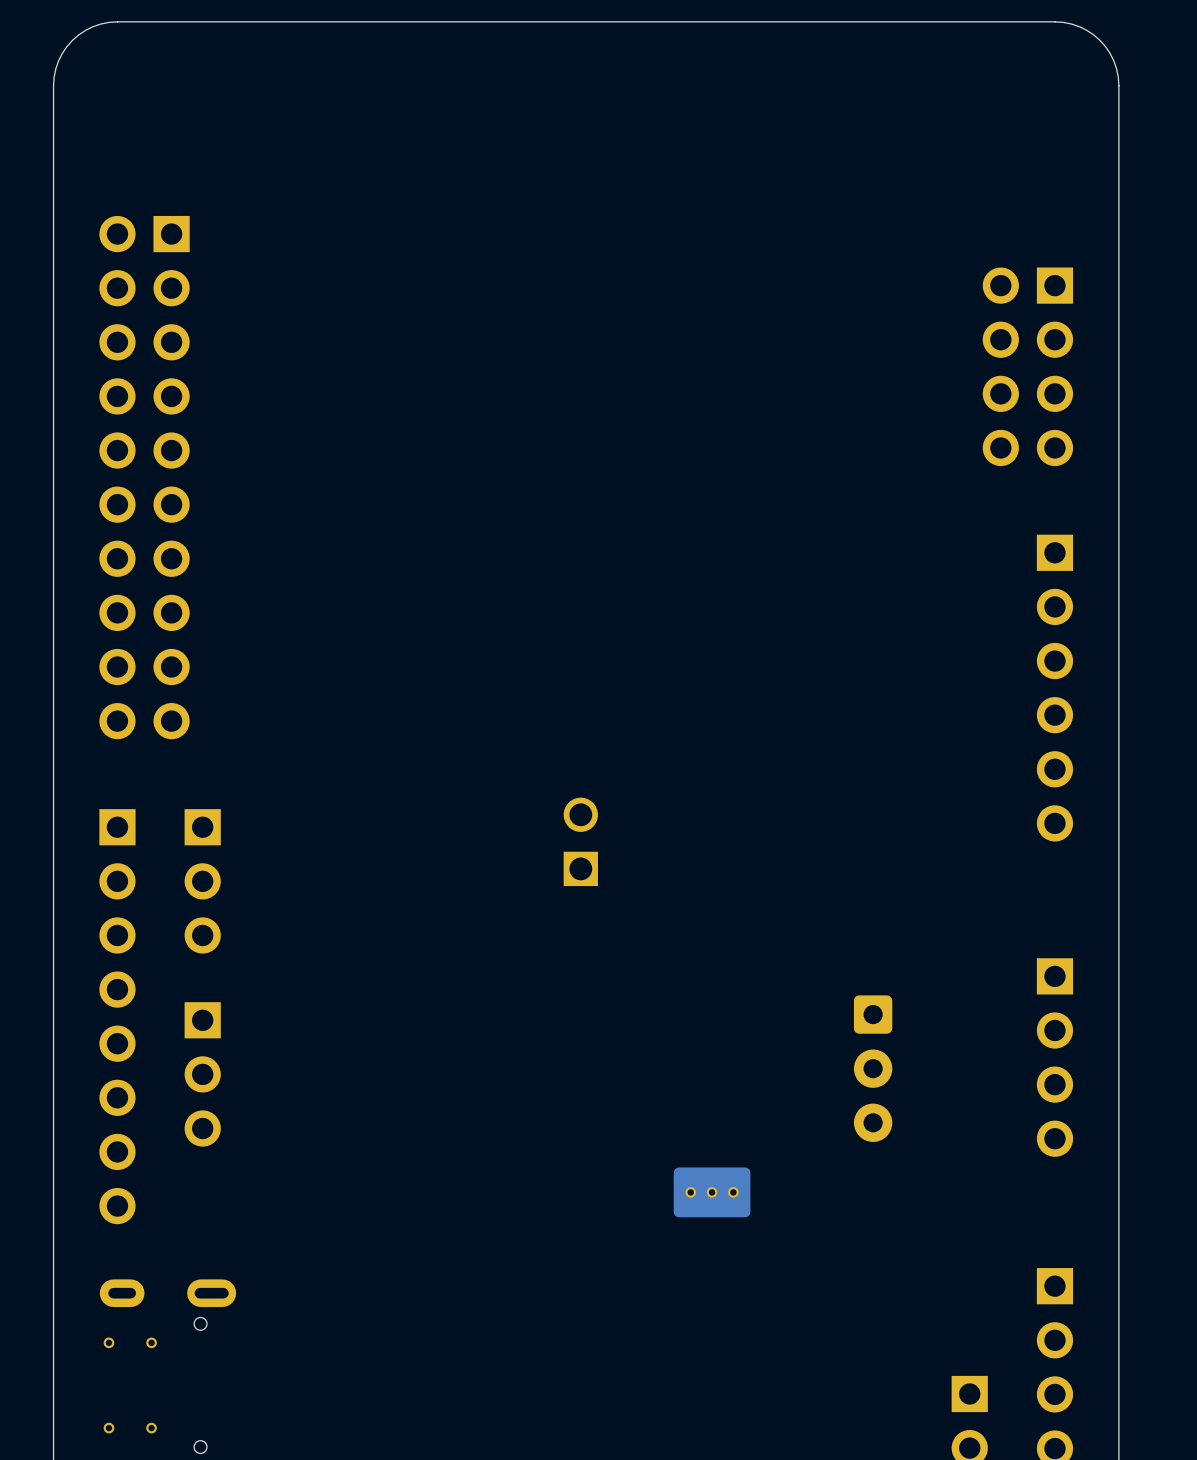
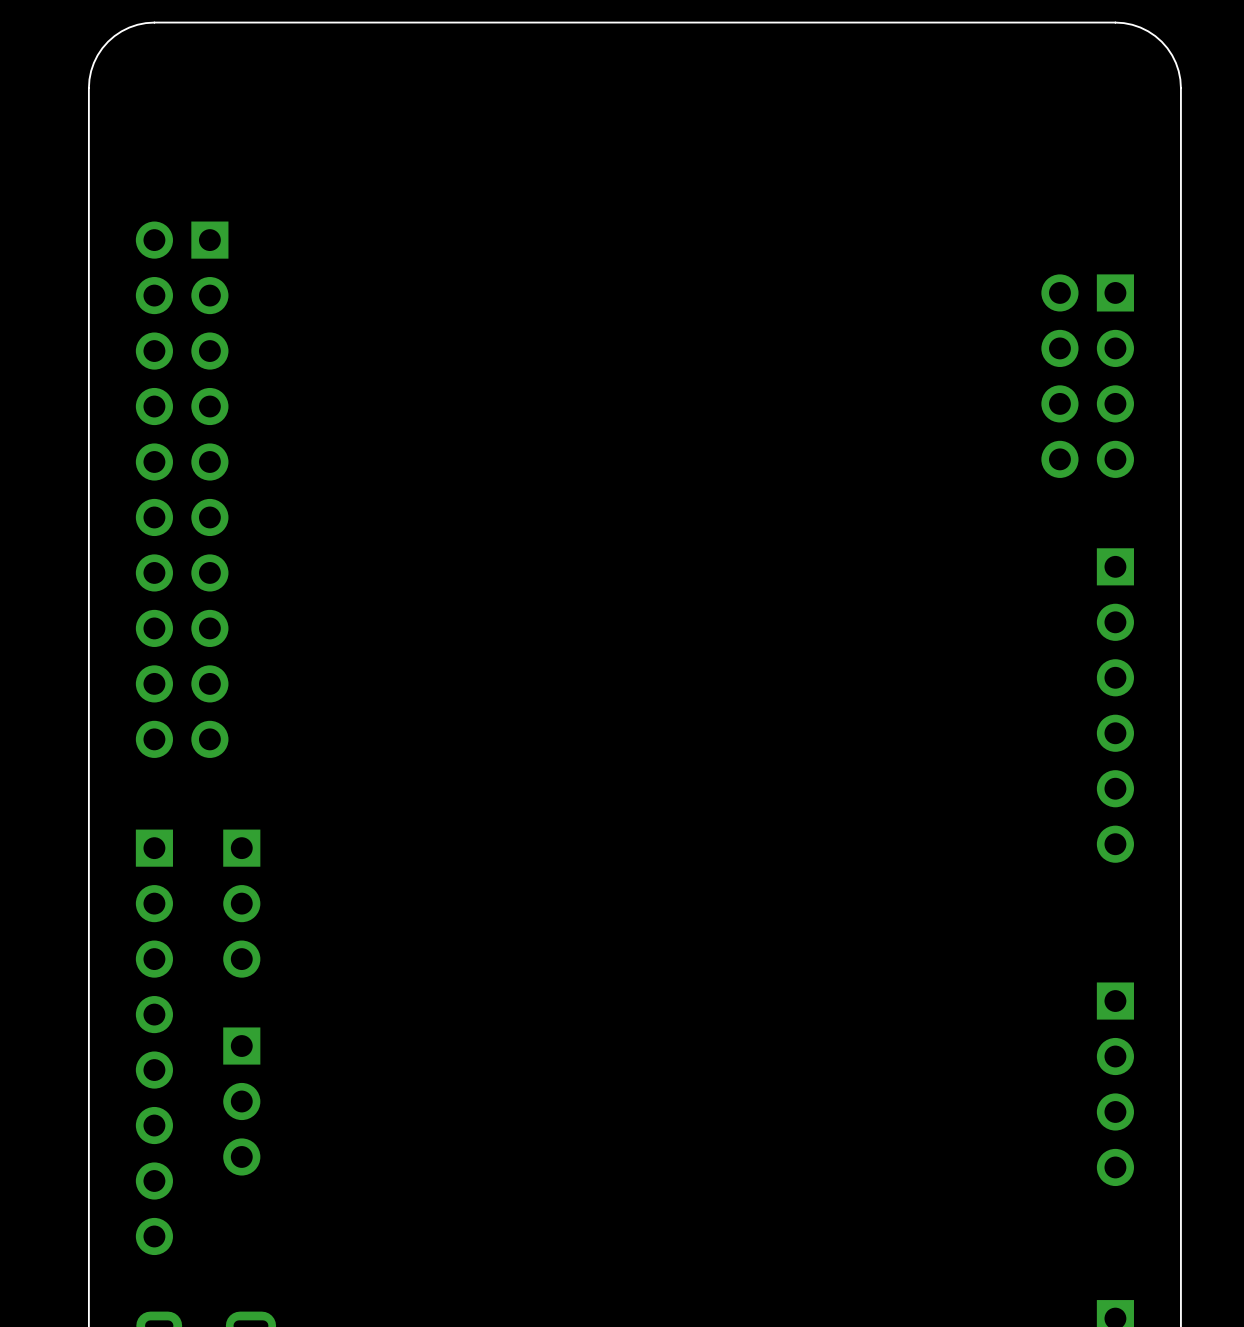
part: (580, 841) -> none
part: (873, 1068) -> none
part: (712, 1192) -> none

